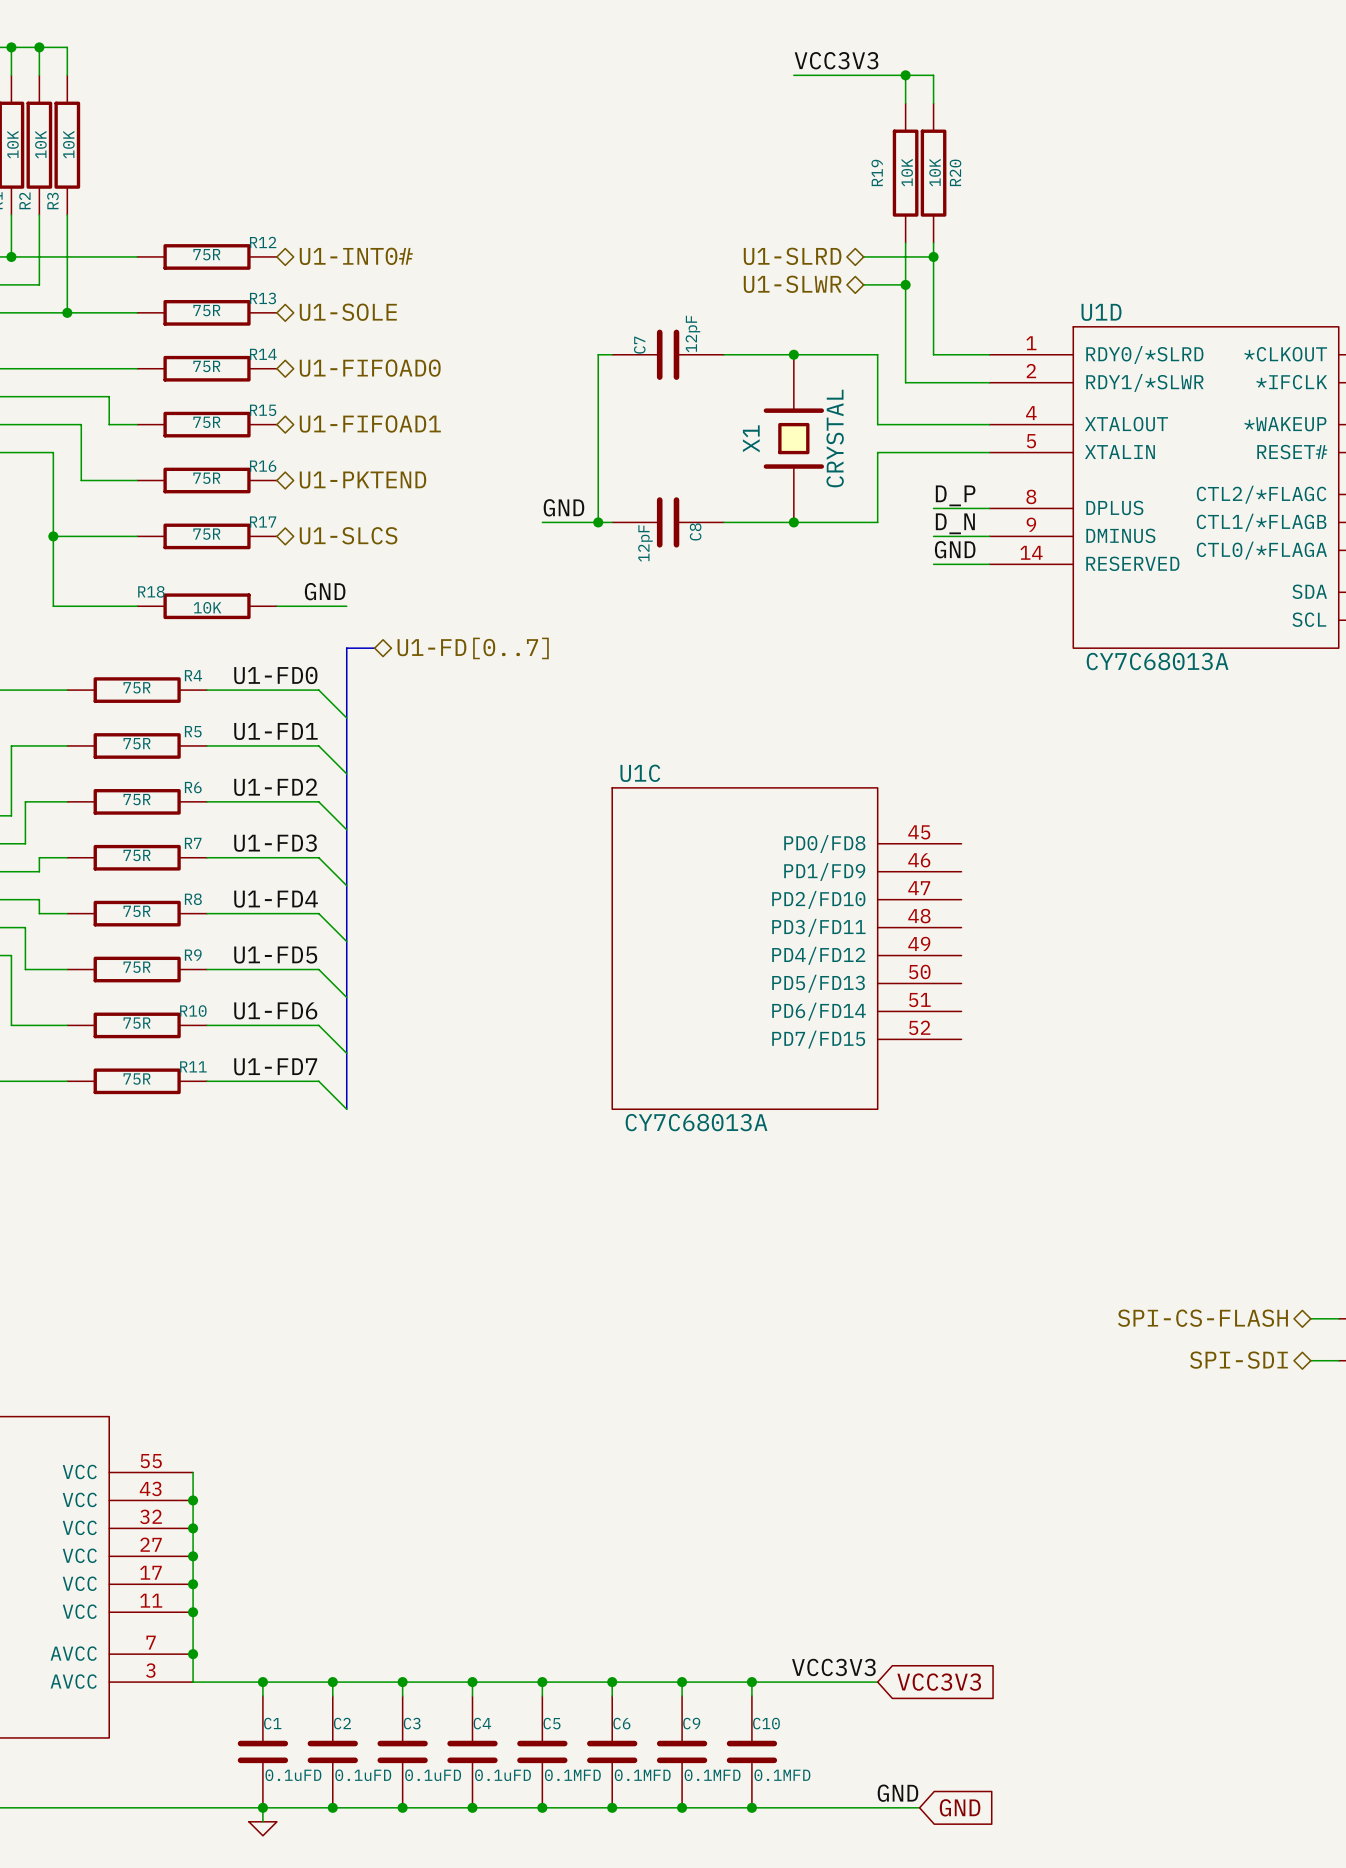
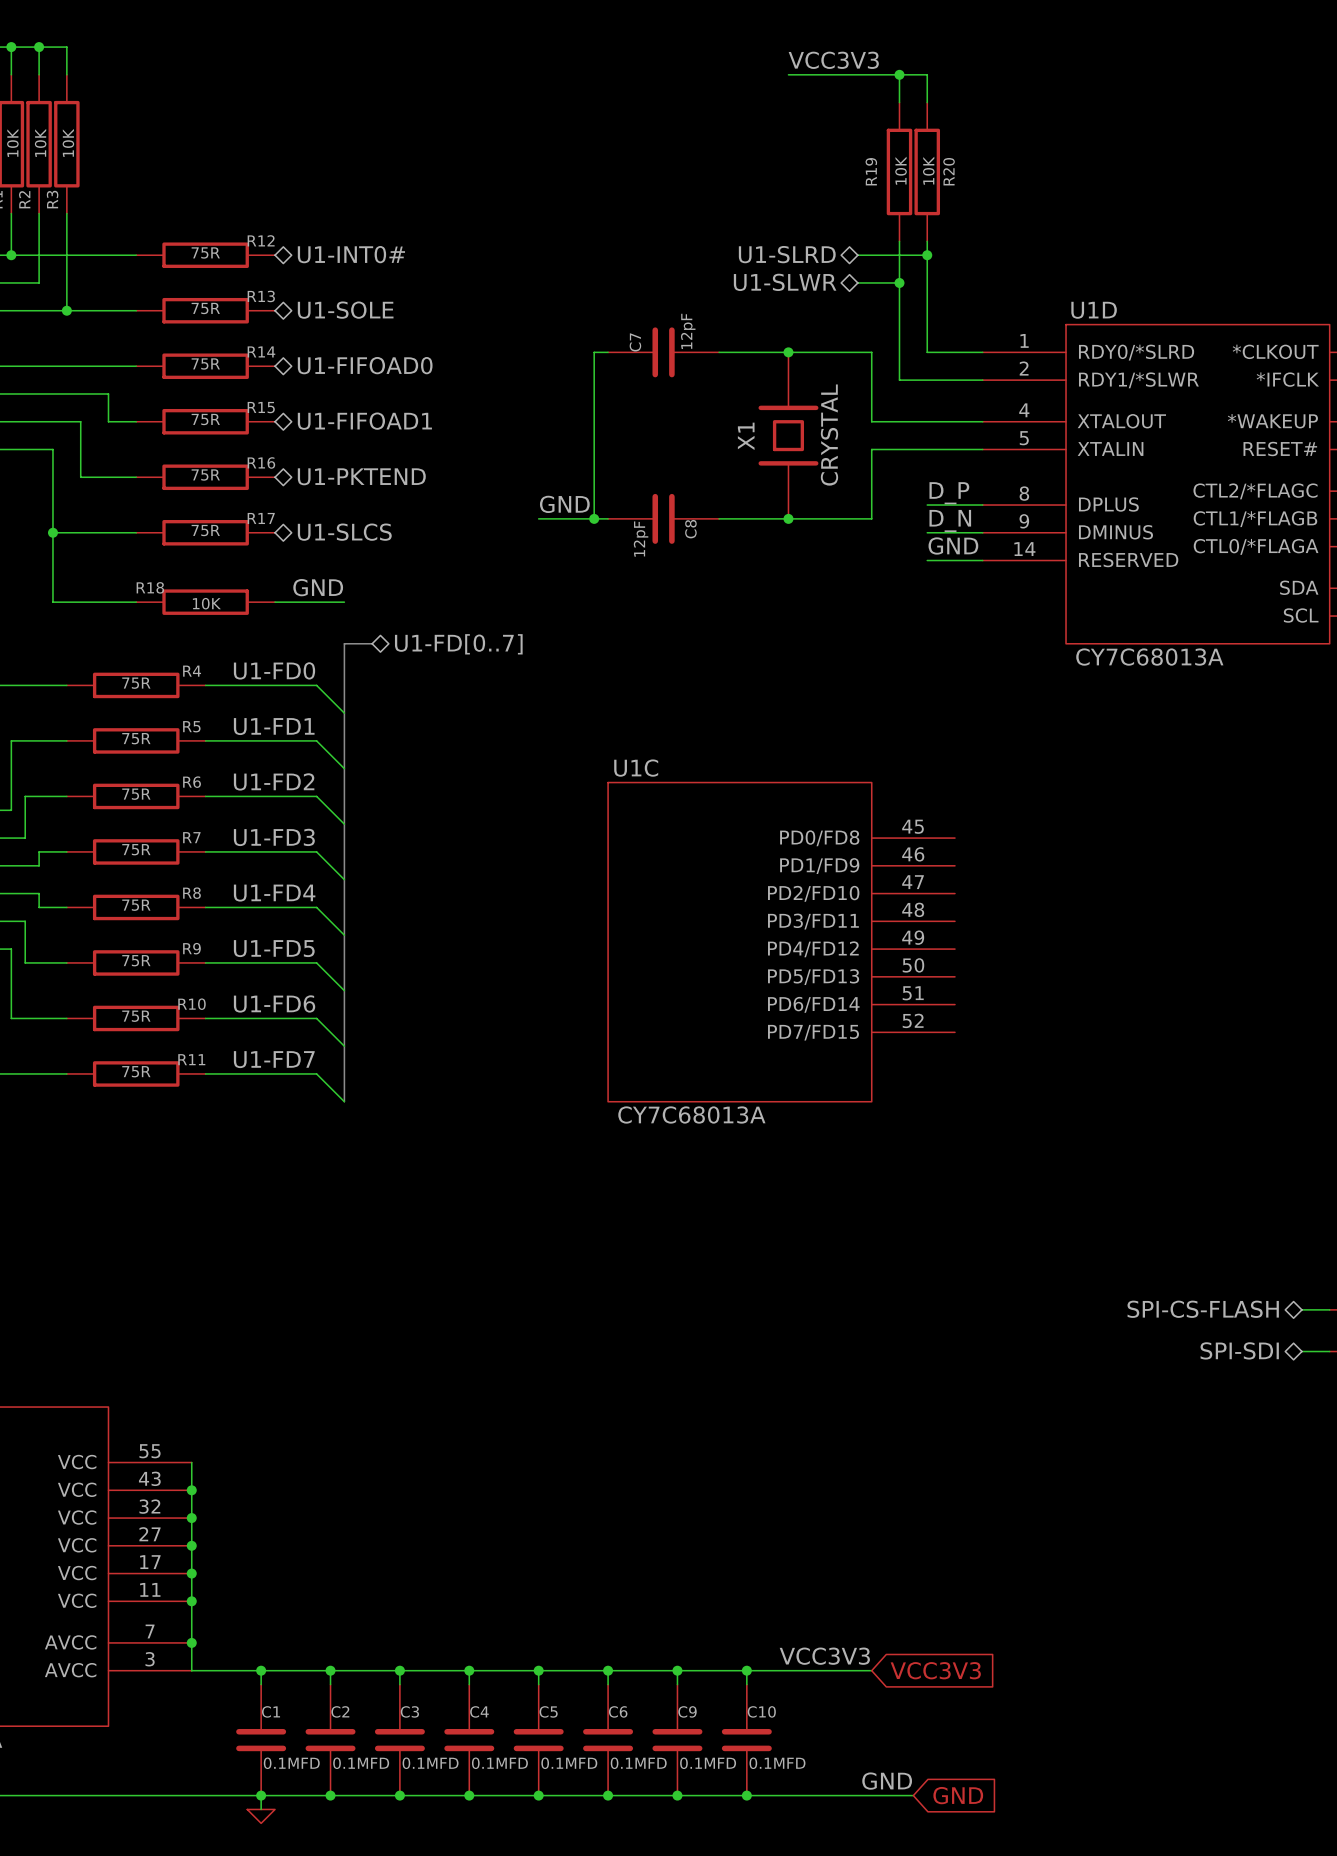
C1 value: 0.1uFD (293, 1775) -> 0.1MFD (291, 1763)
C2 value: 0.1uFD (363, 1775) -> 0.1MFD (361, 1763)
C3 value: 0.1uFD (433, 1775) -> 0.1MFD (430, 1763)
C4 value: 0.1uFD (502, 1775) -> 0.1MFD (499, 1763)

